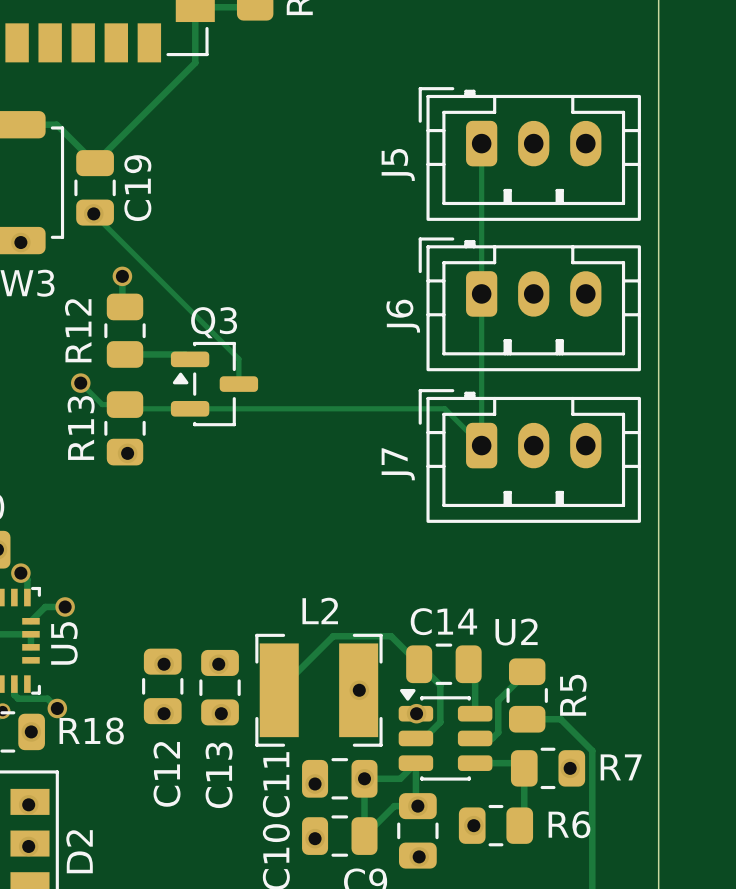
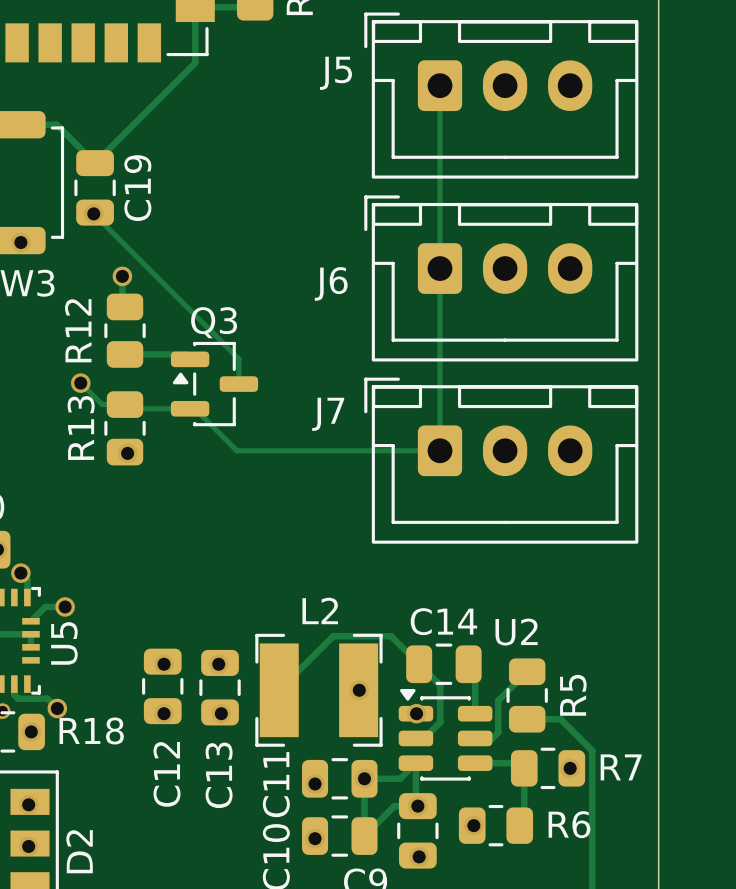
J5 footprint: [418, 87, 641, 221] -> [364, 12, 639, 179]
track: (481, 143) (481, 445) (444, 408) (194, 408) -> (440, 85) (440, 450) (236, 450) (194, 408)
J6 footprint: [418, 237, 641, 372] -> [364, 195, 639, 362]
J7 footprint: [418, 389, 641, 523] -> [364, 377, 639, 544]
J7 name position: J7 (398, 464) -> J7 (328, 414)

